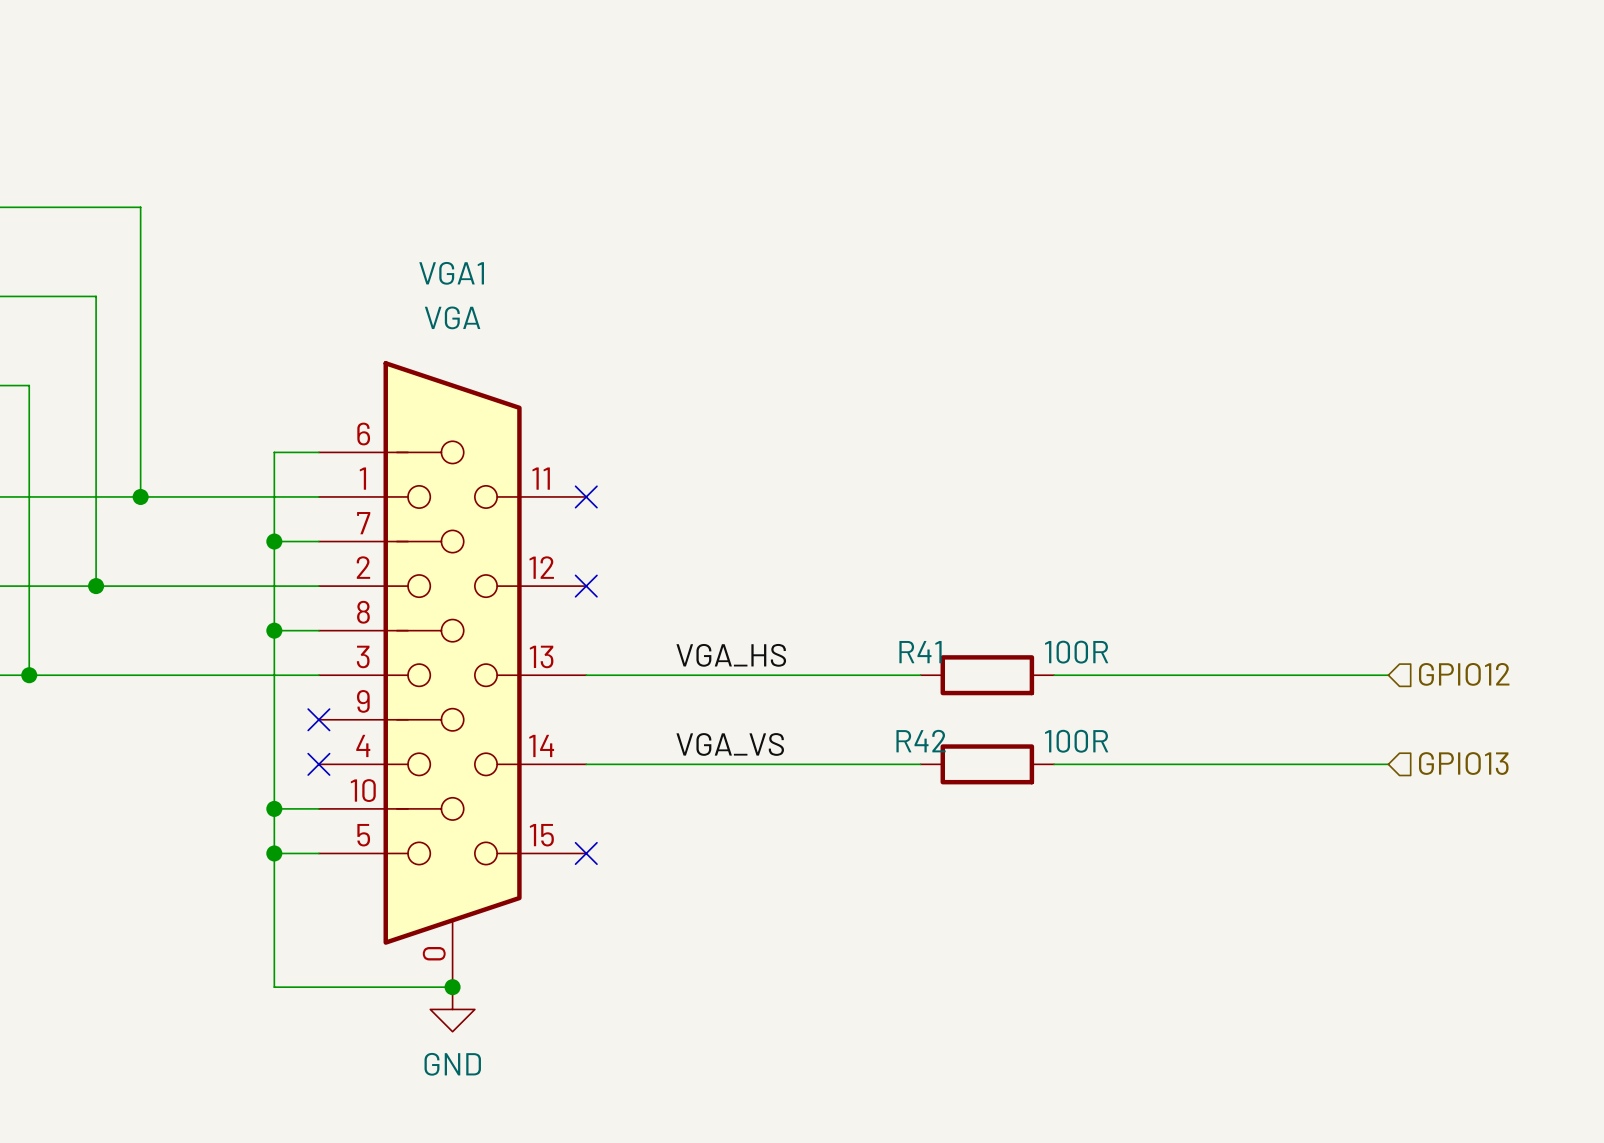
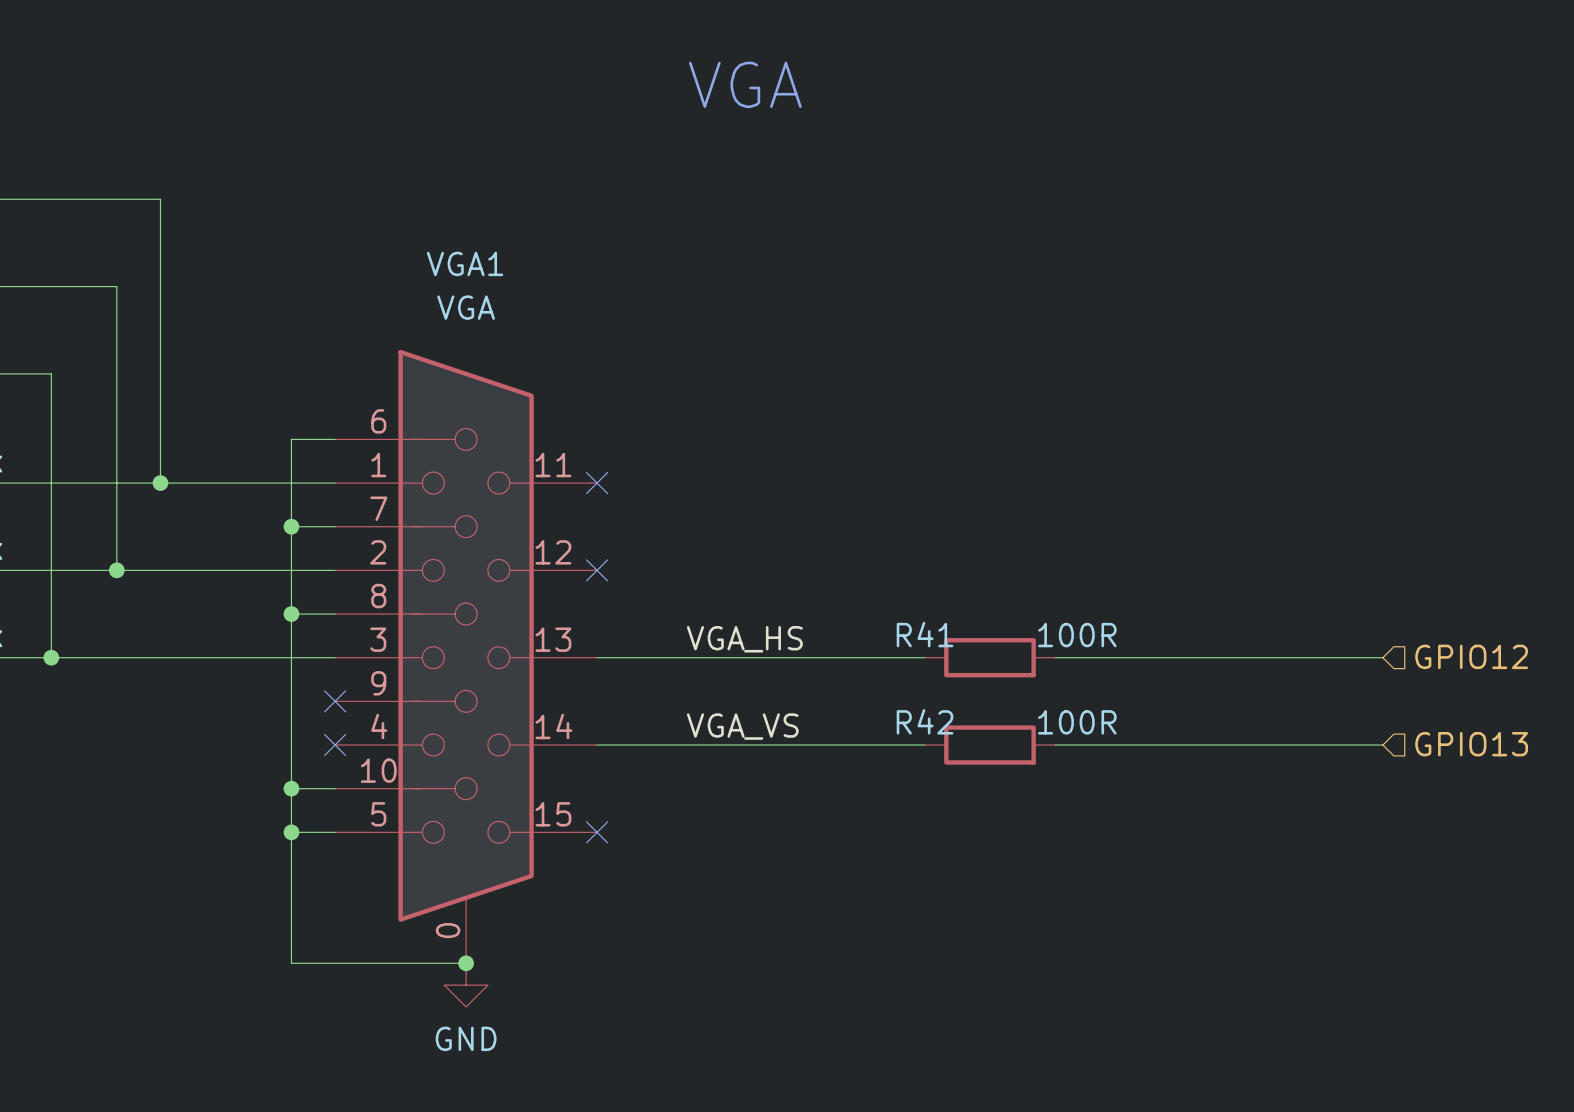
text: none -> VGA (745, 84)

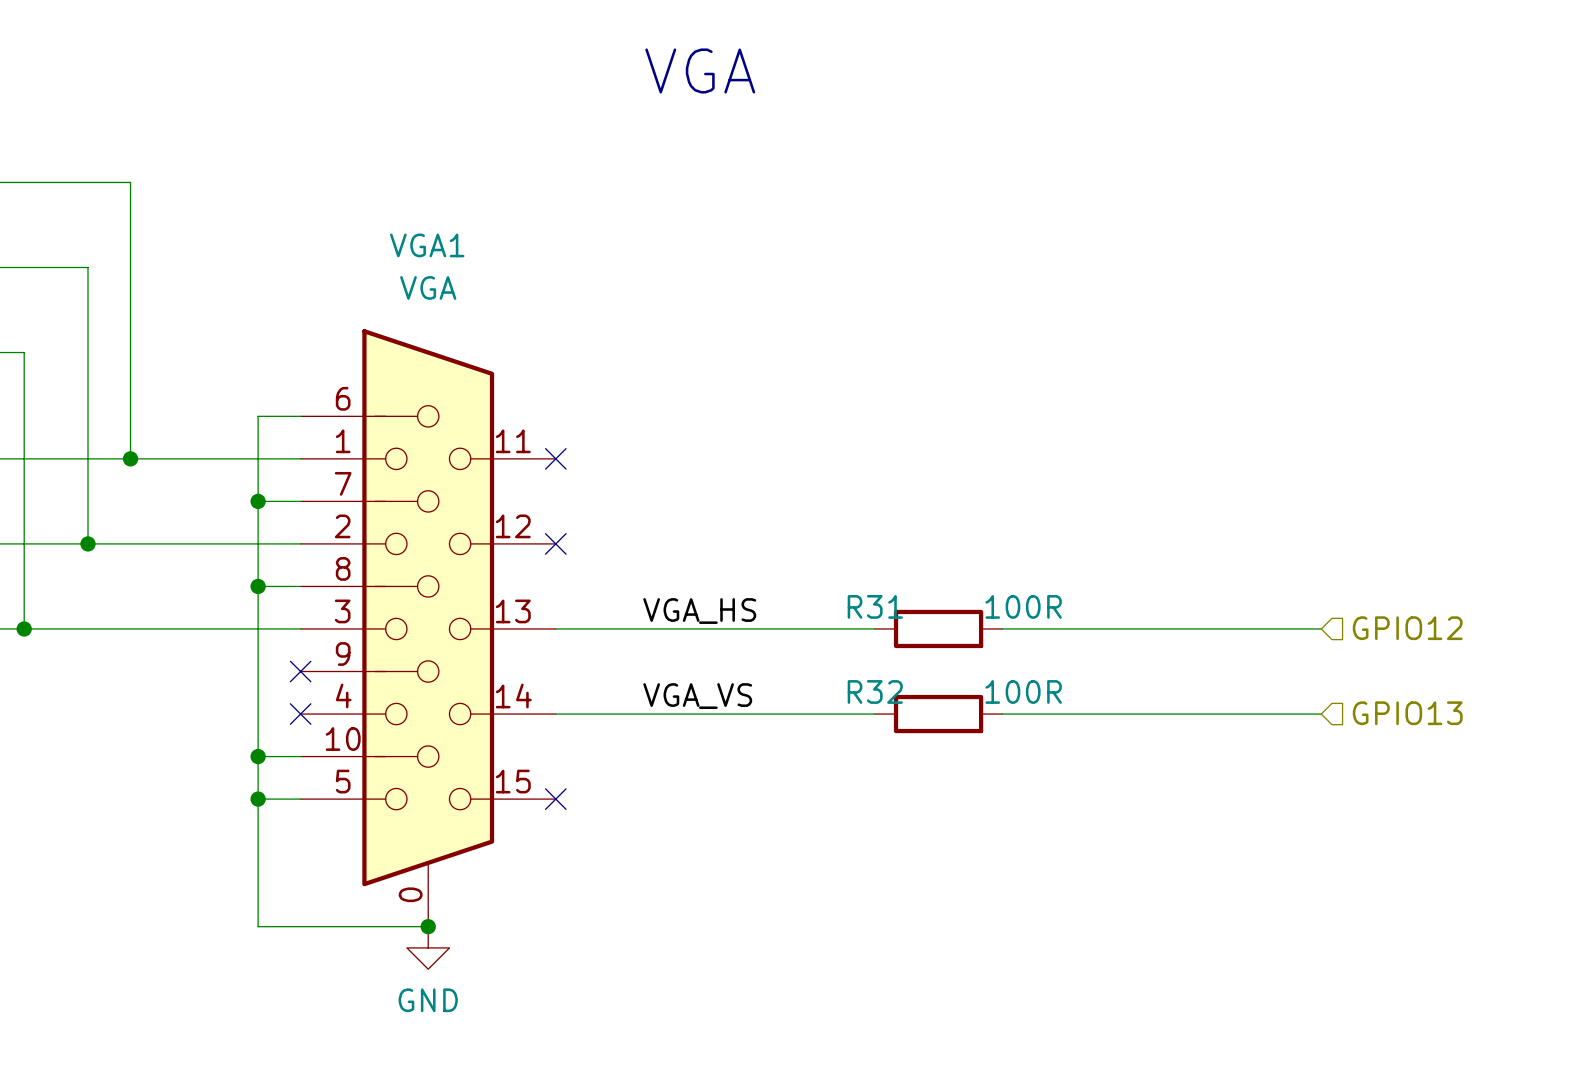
R41 name: R41 (925, 634) -> R31 (875, 606)
R42 name: R42 (925, 721) -> R32 (875, 691)

